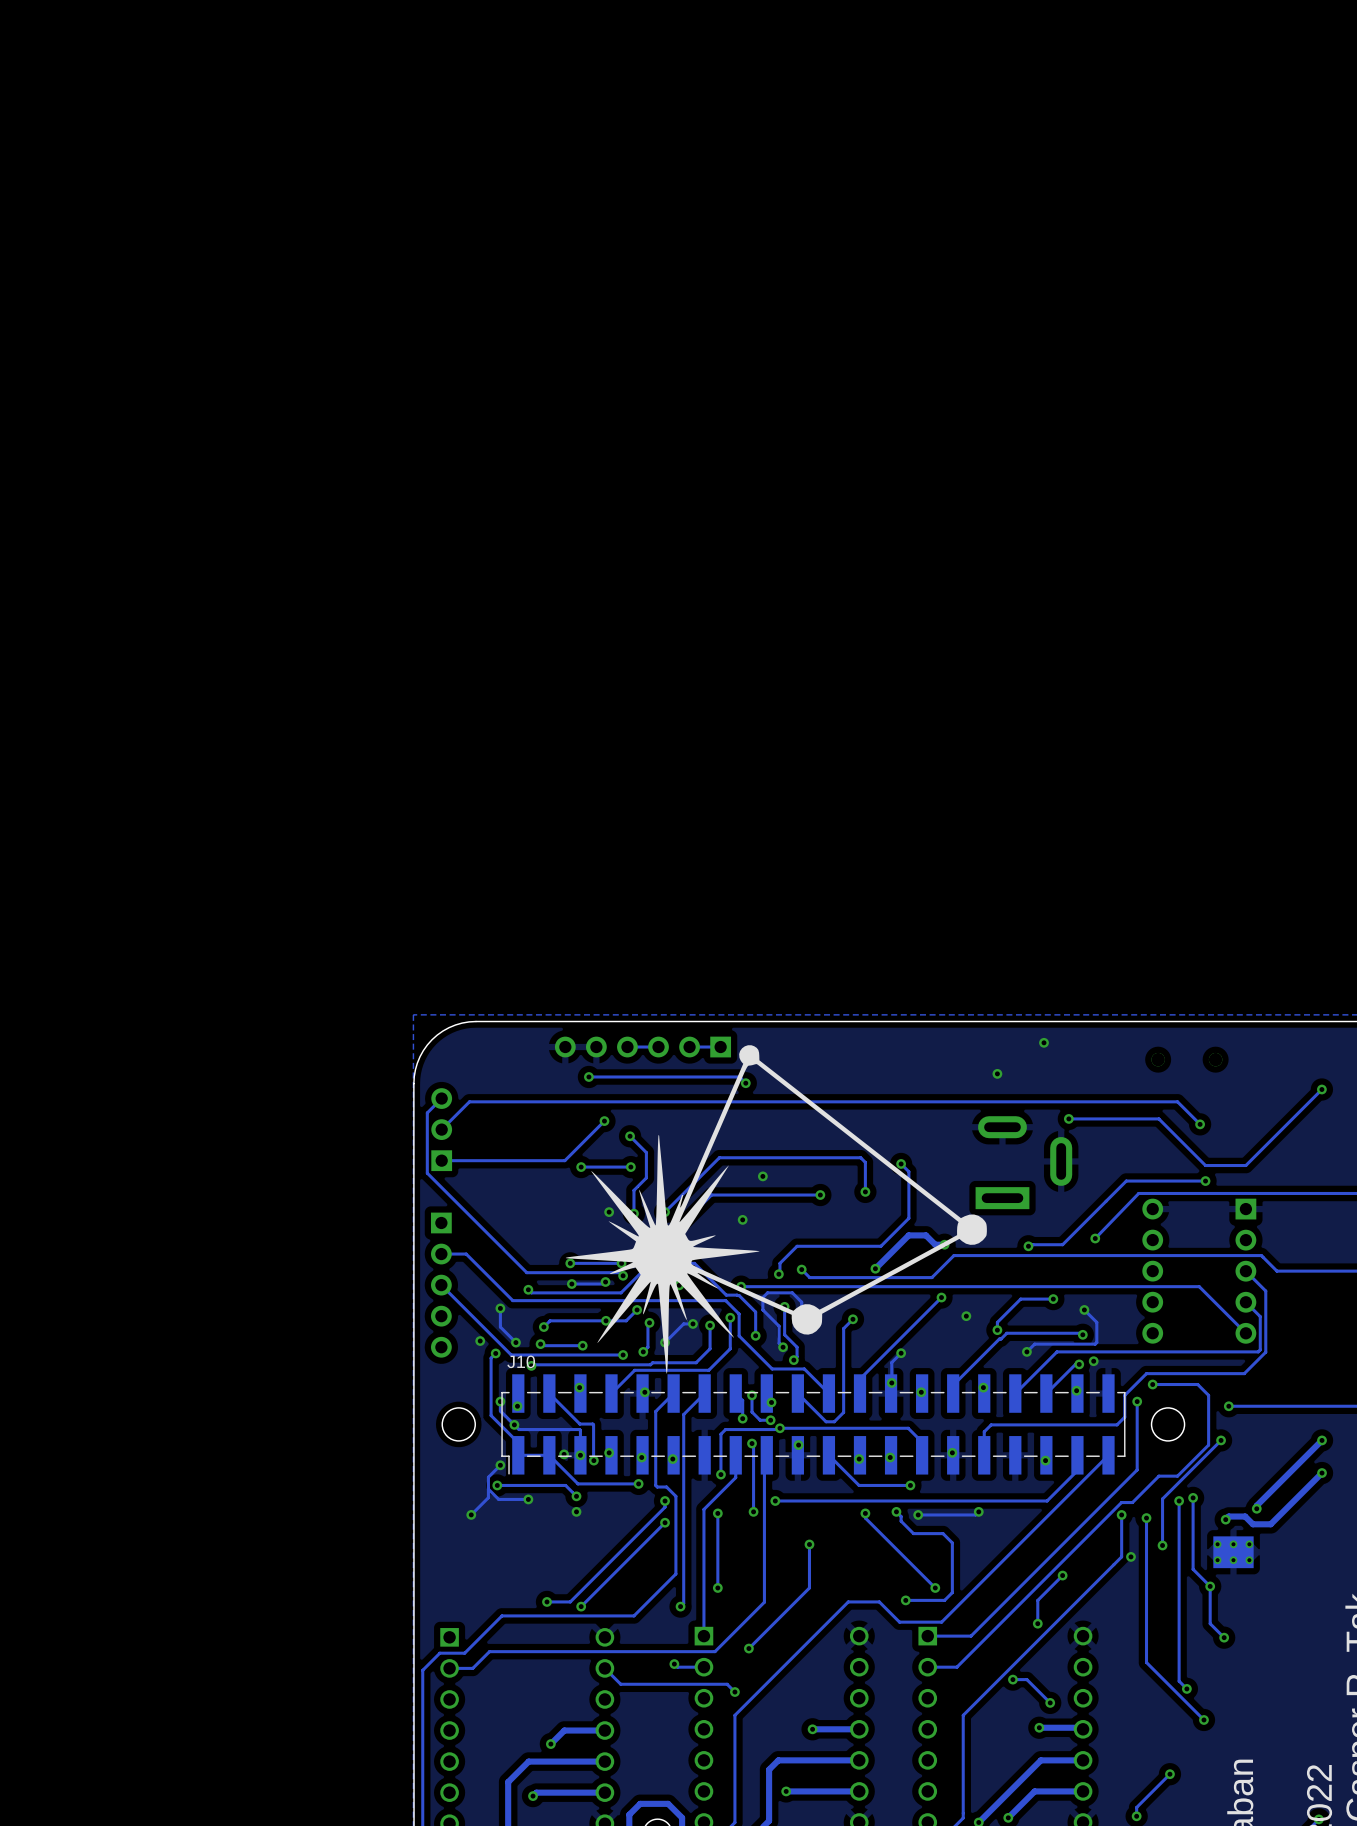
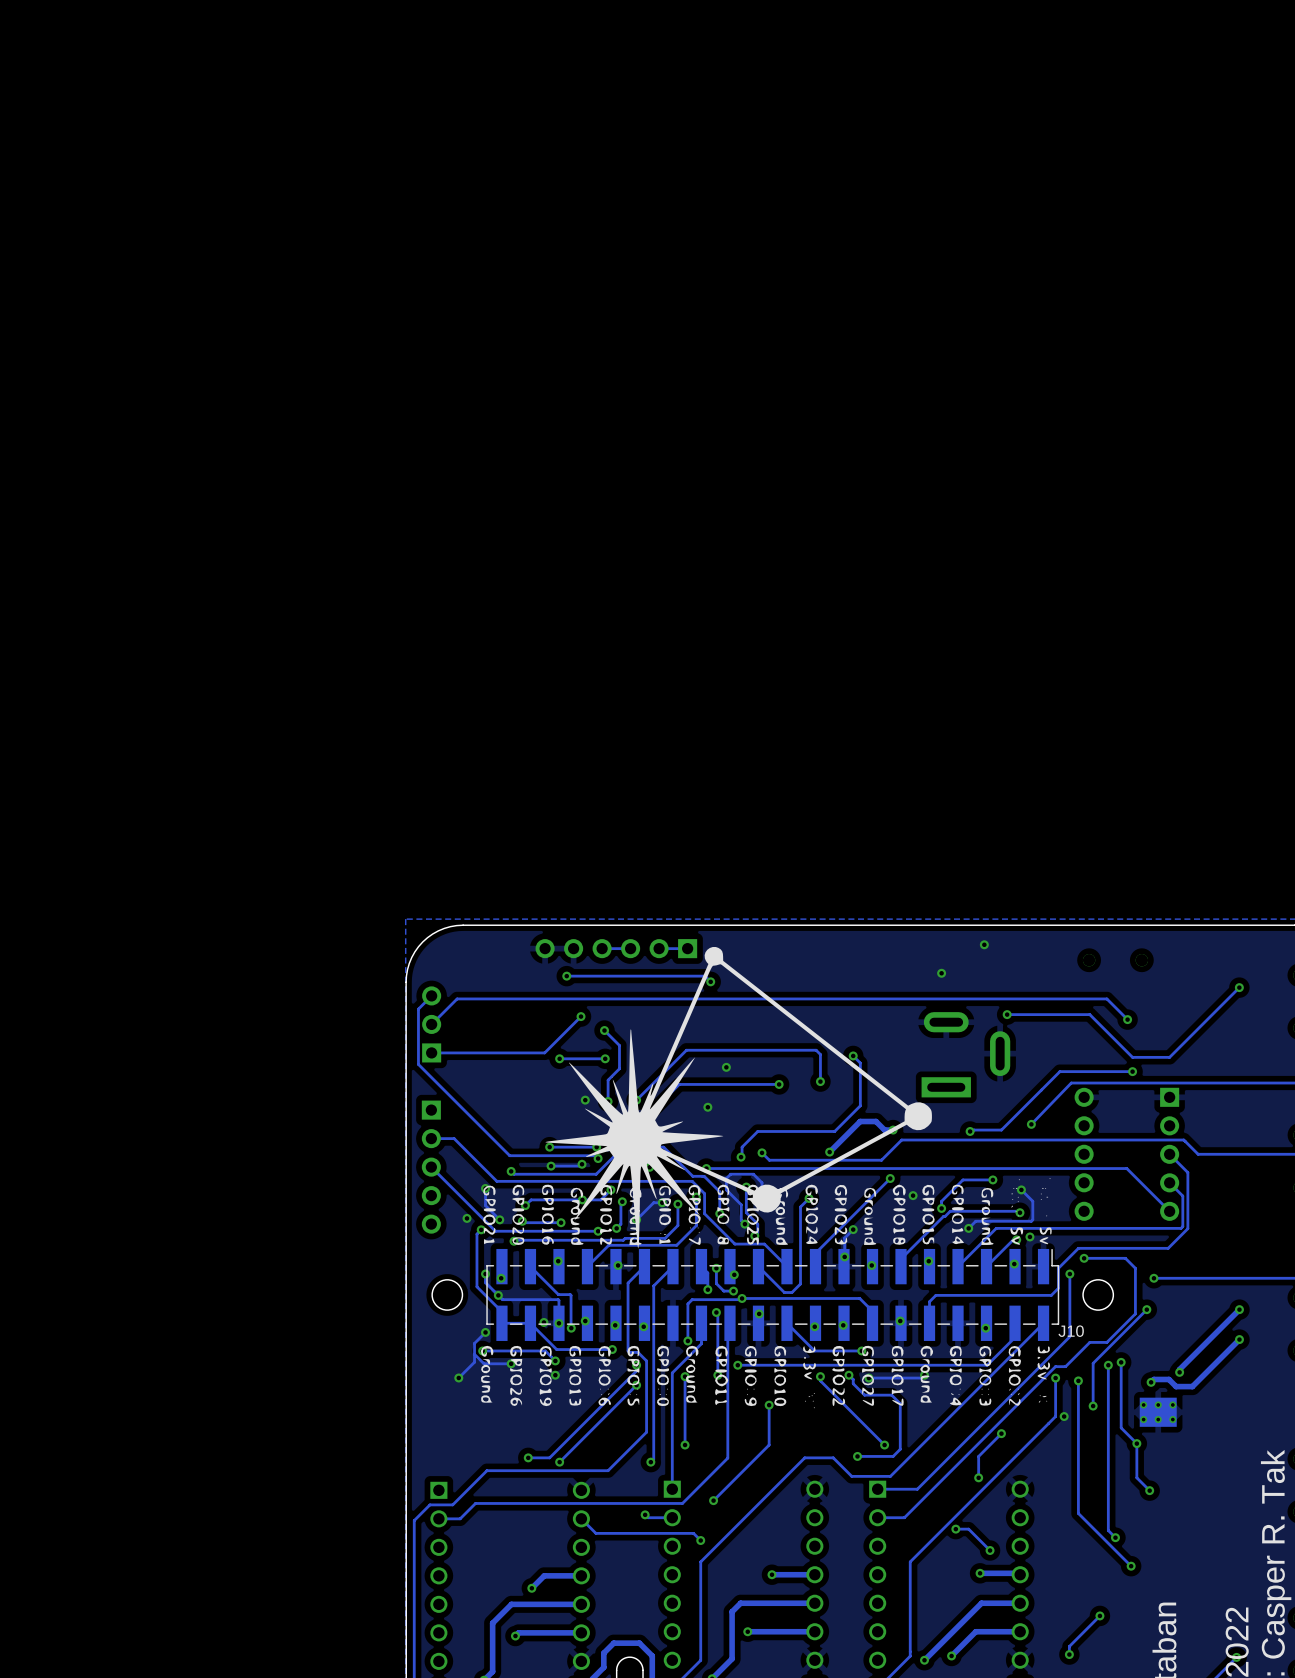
drawing: none -> [480, 1178, 1052, 1409]
J10 name position: J10 (521, 1361) -> J10 (1071, 1331)
J10 rotation: 0° (813, 1424) -> 180° (772, 1294)

